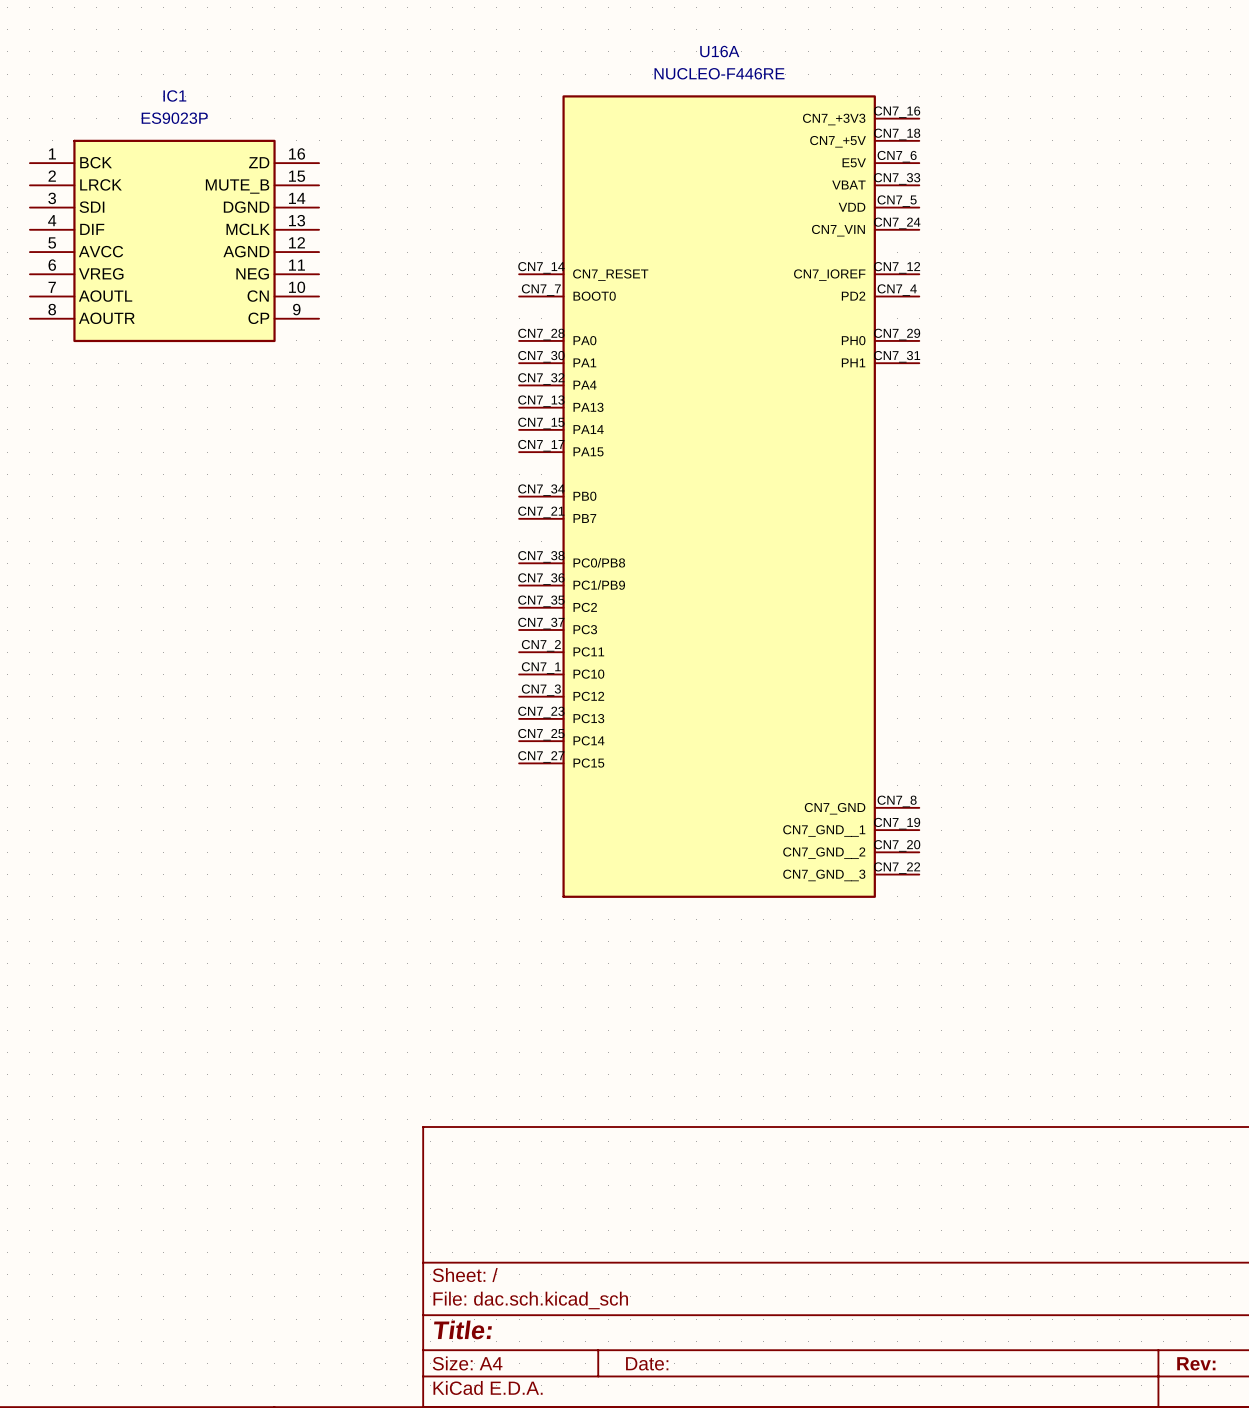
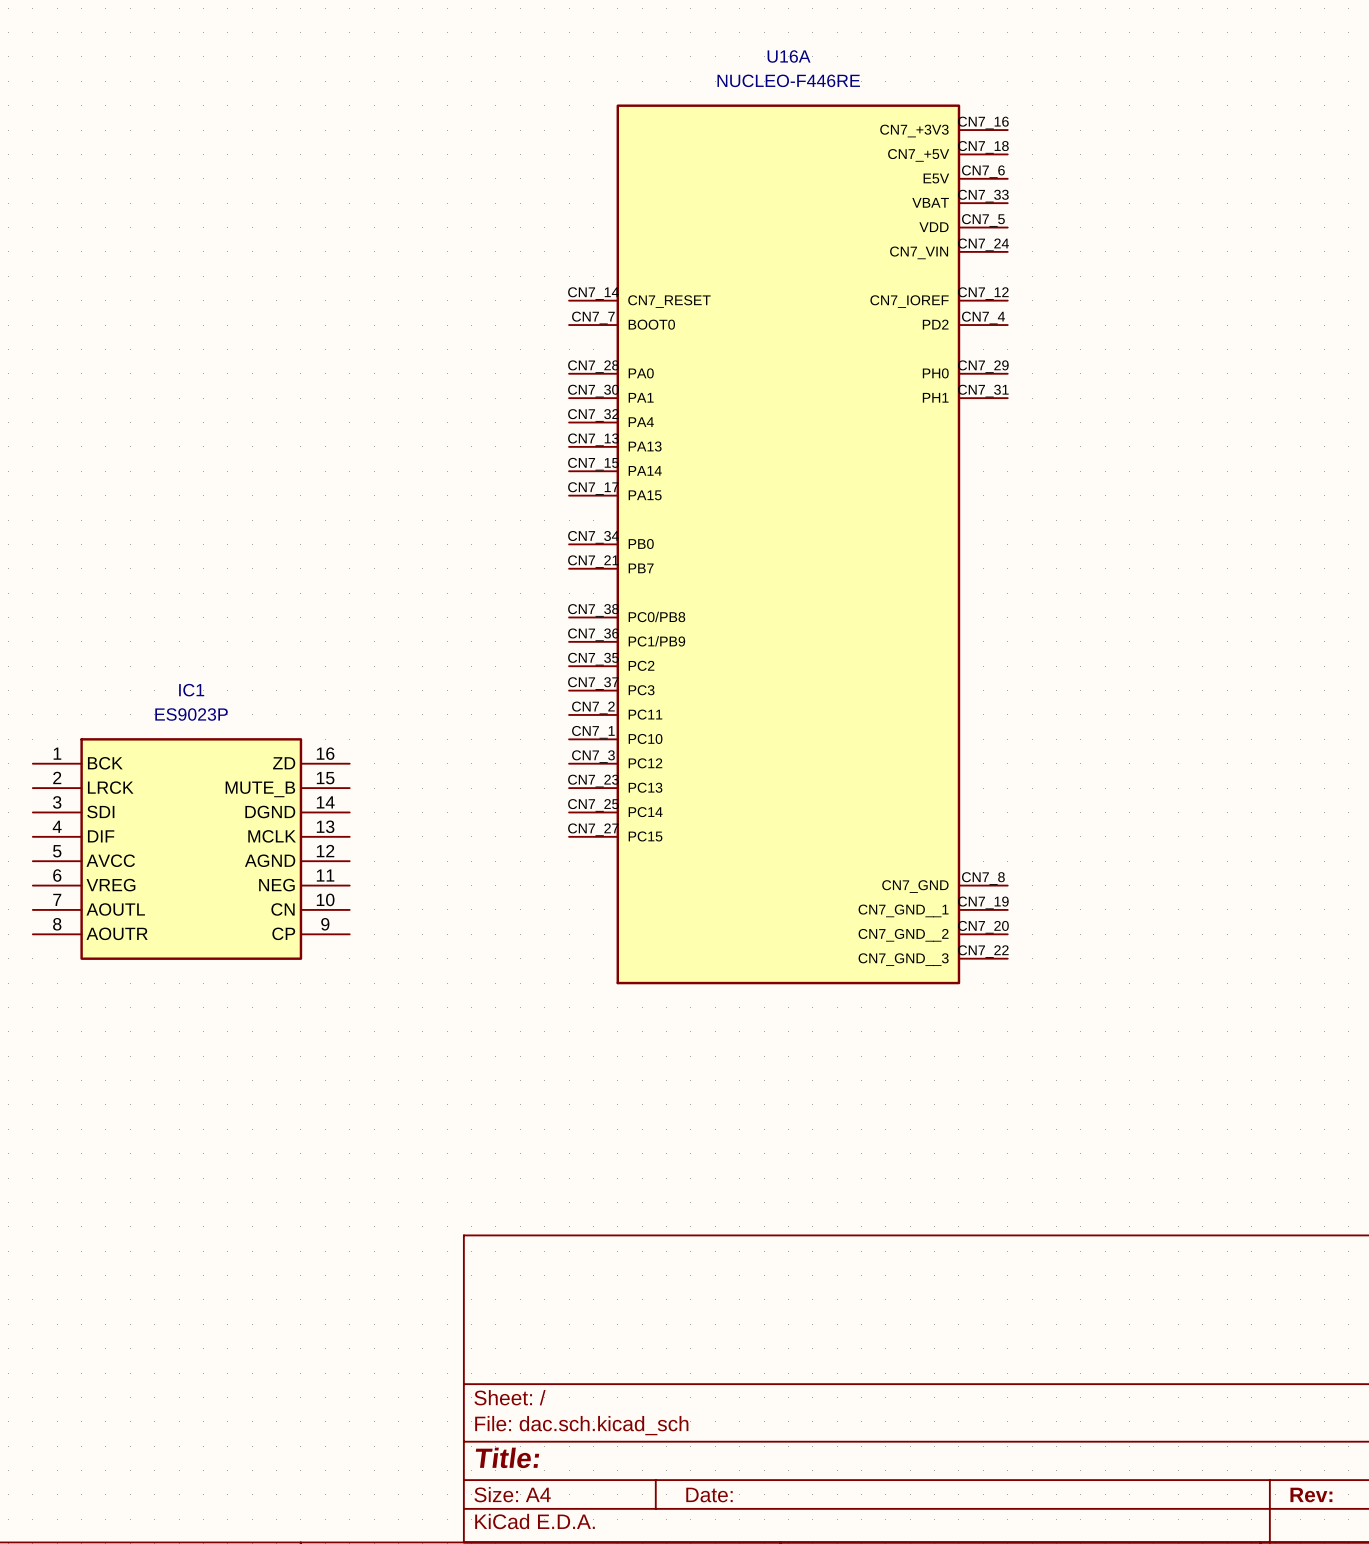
IC1 position: (174, 240) -> (191, 849)

